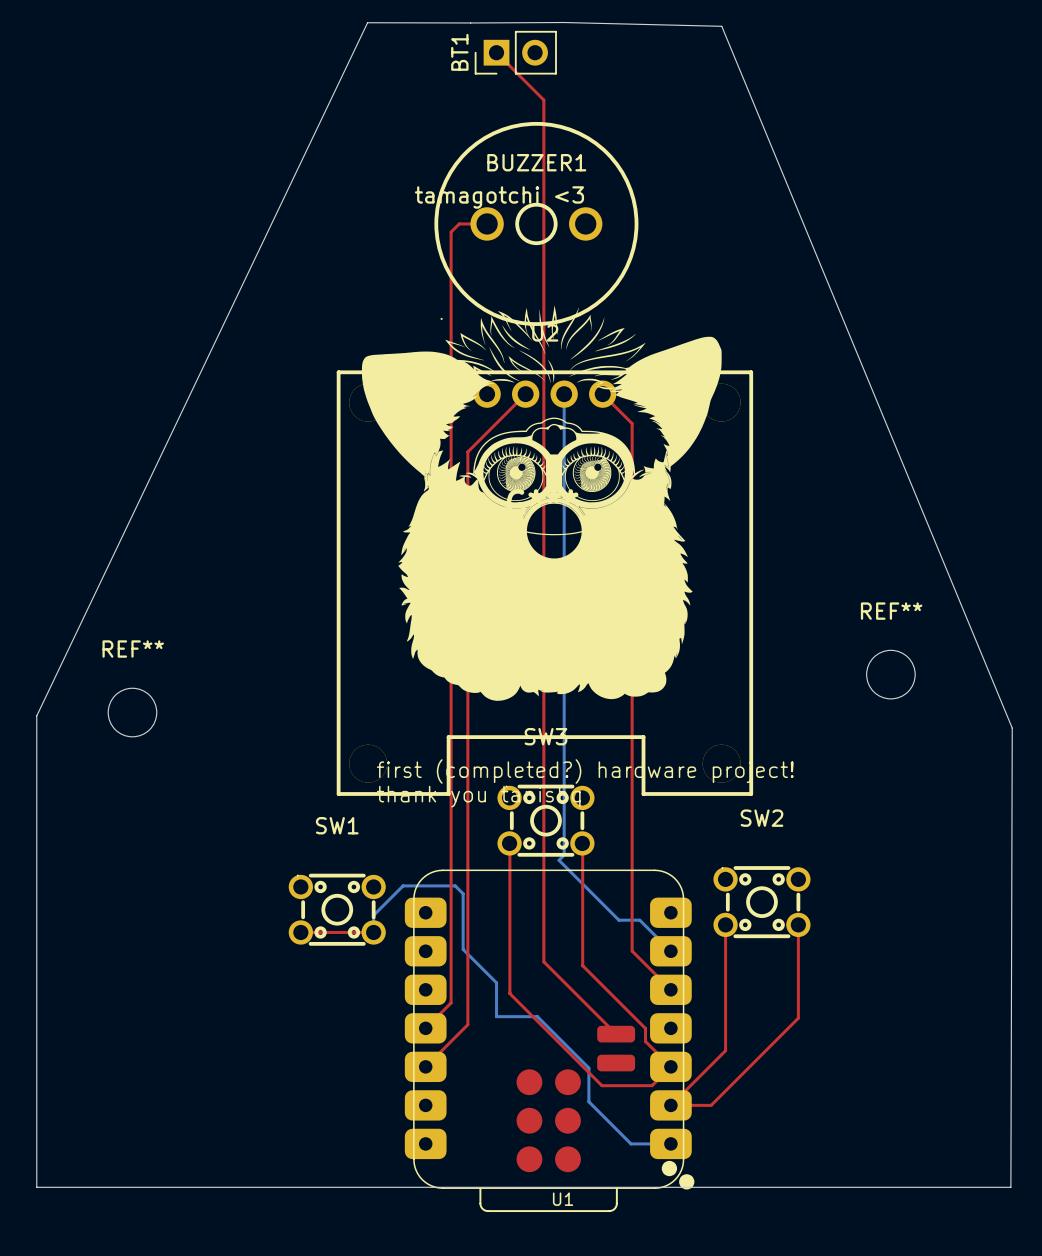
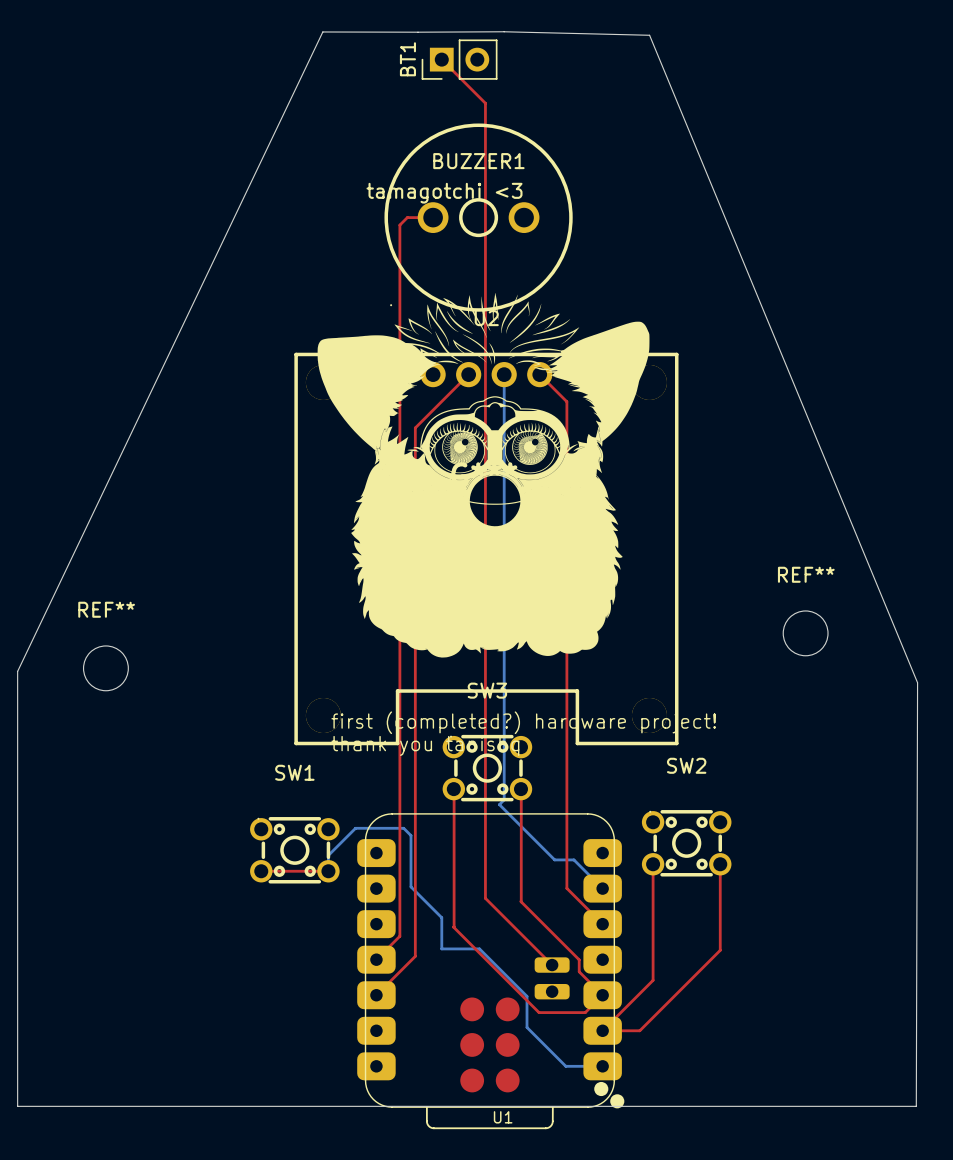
U1 footprint: [404, 869, 695, 1213] -> [357, 813, 625, 1130]

